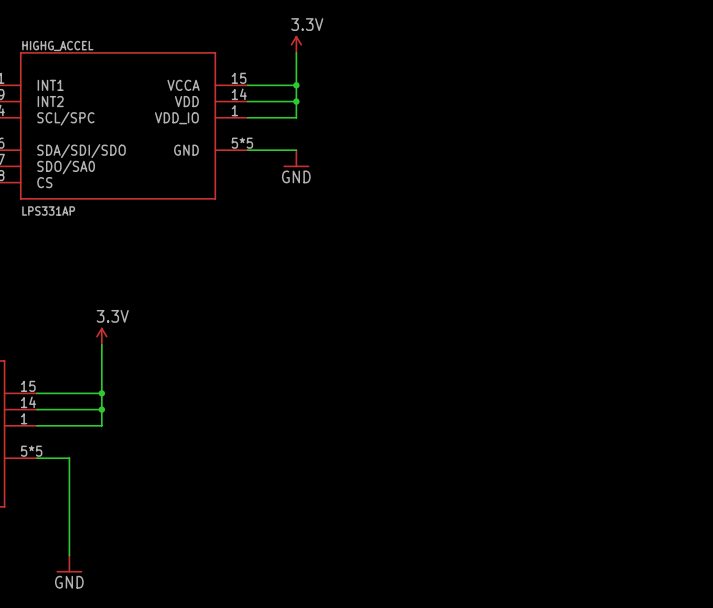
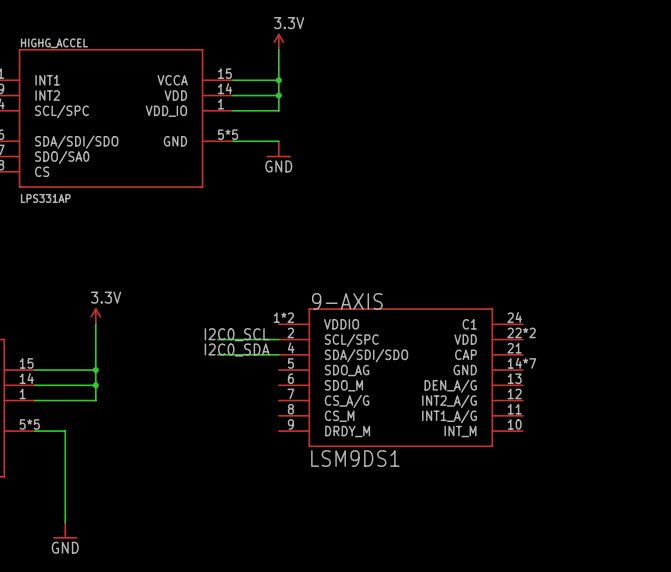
label: none -> I2C0_SCL (236, 334)
wire: none -> (217, 339) (278, 339)
label: none -> I2C0_SDA (237, 349)
wire: none -> (217, 354) (278, 354)
9-AXIS: none -> (400, 377)

